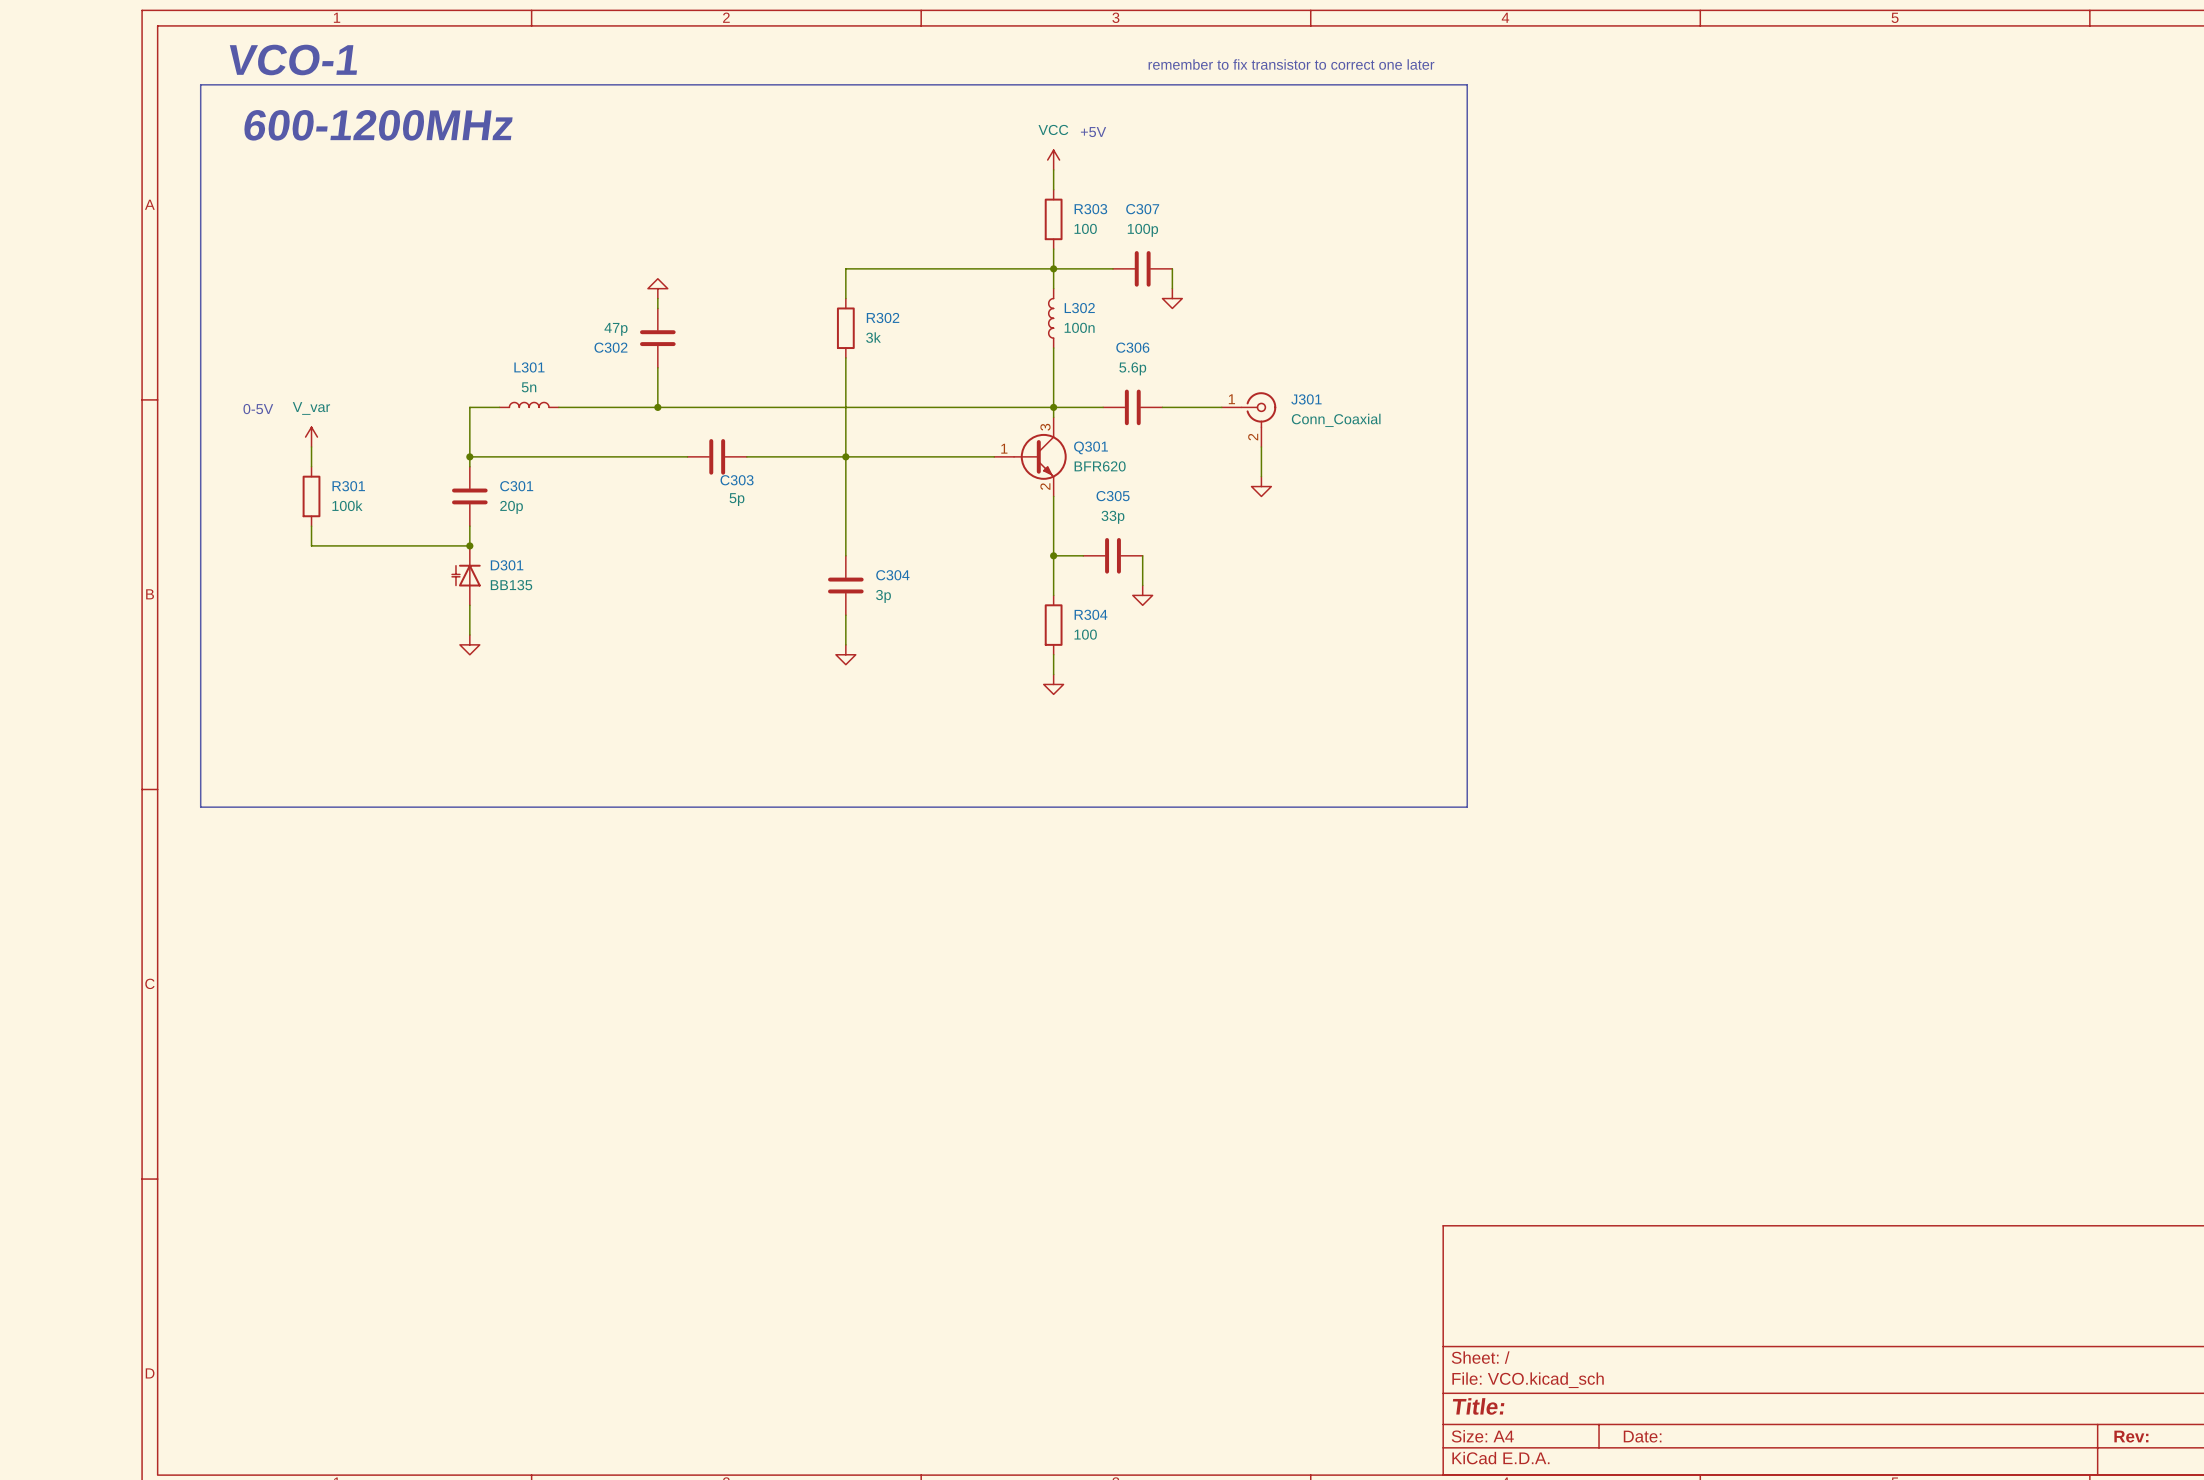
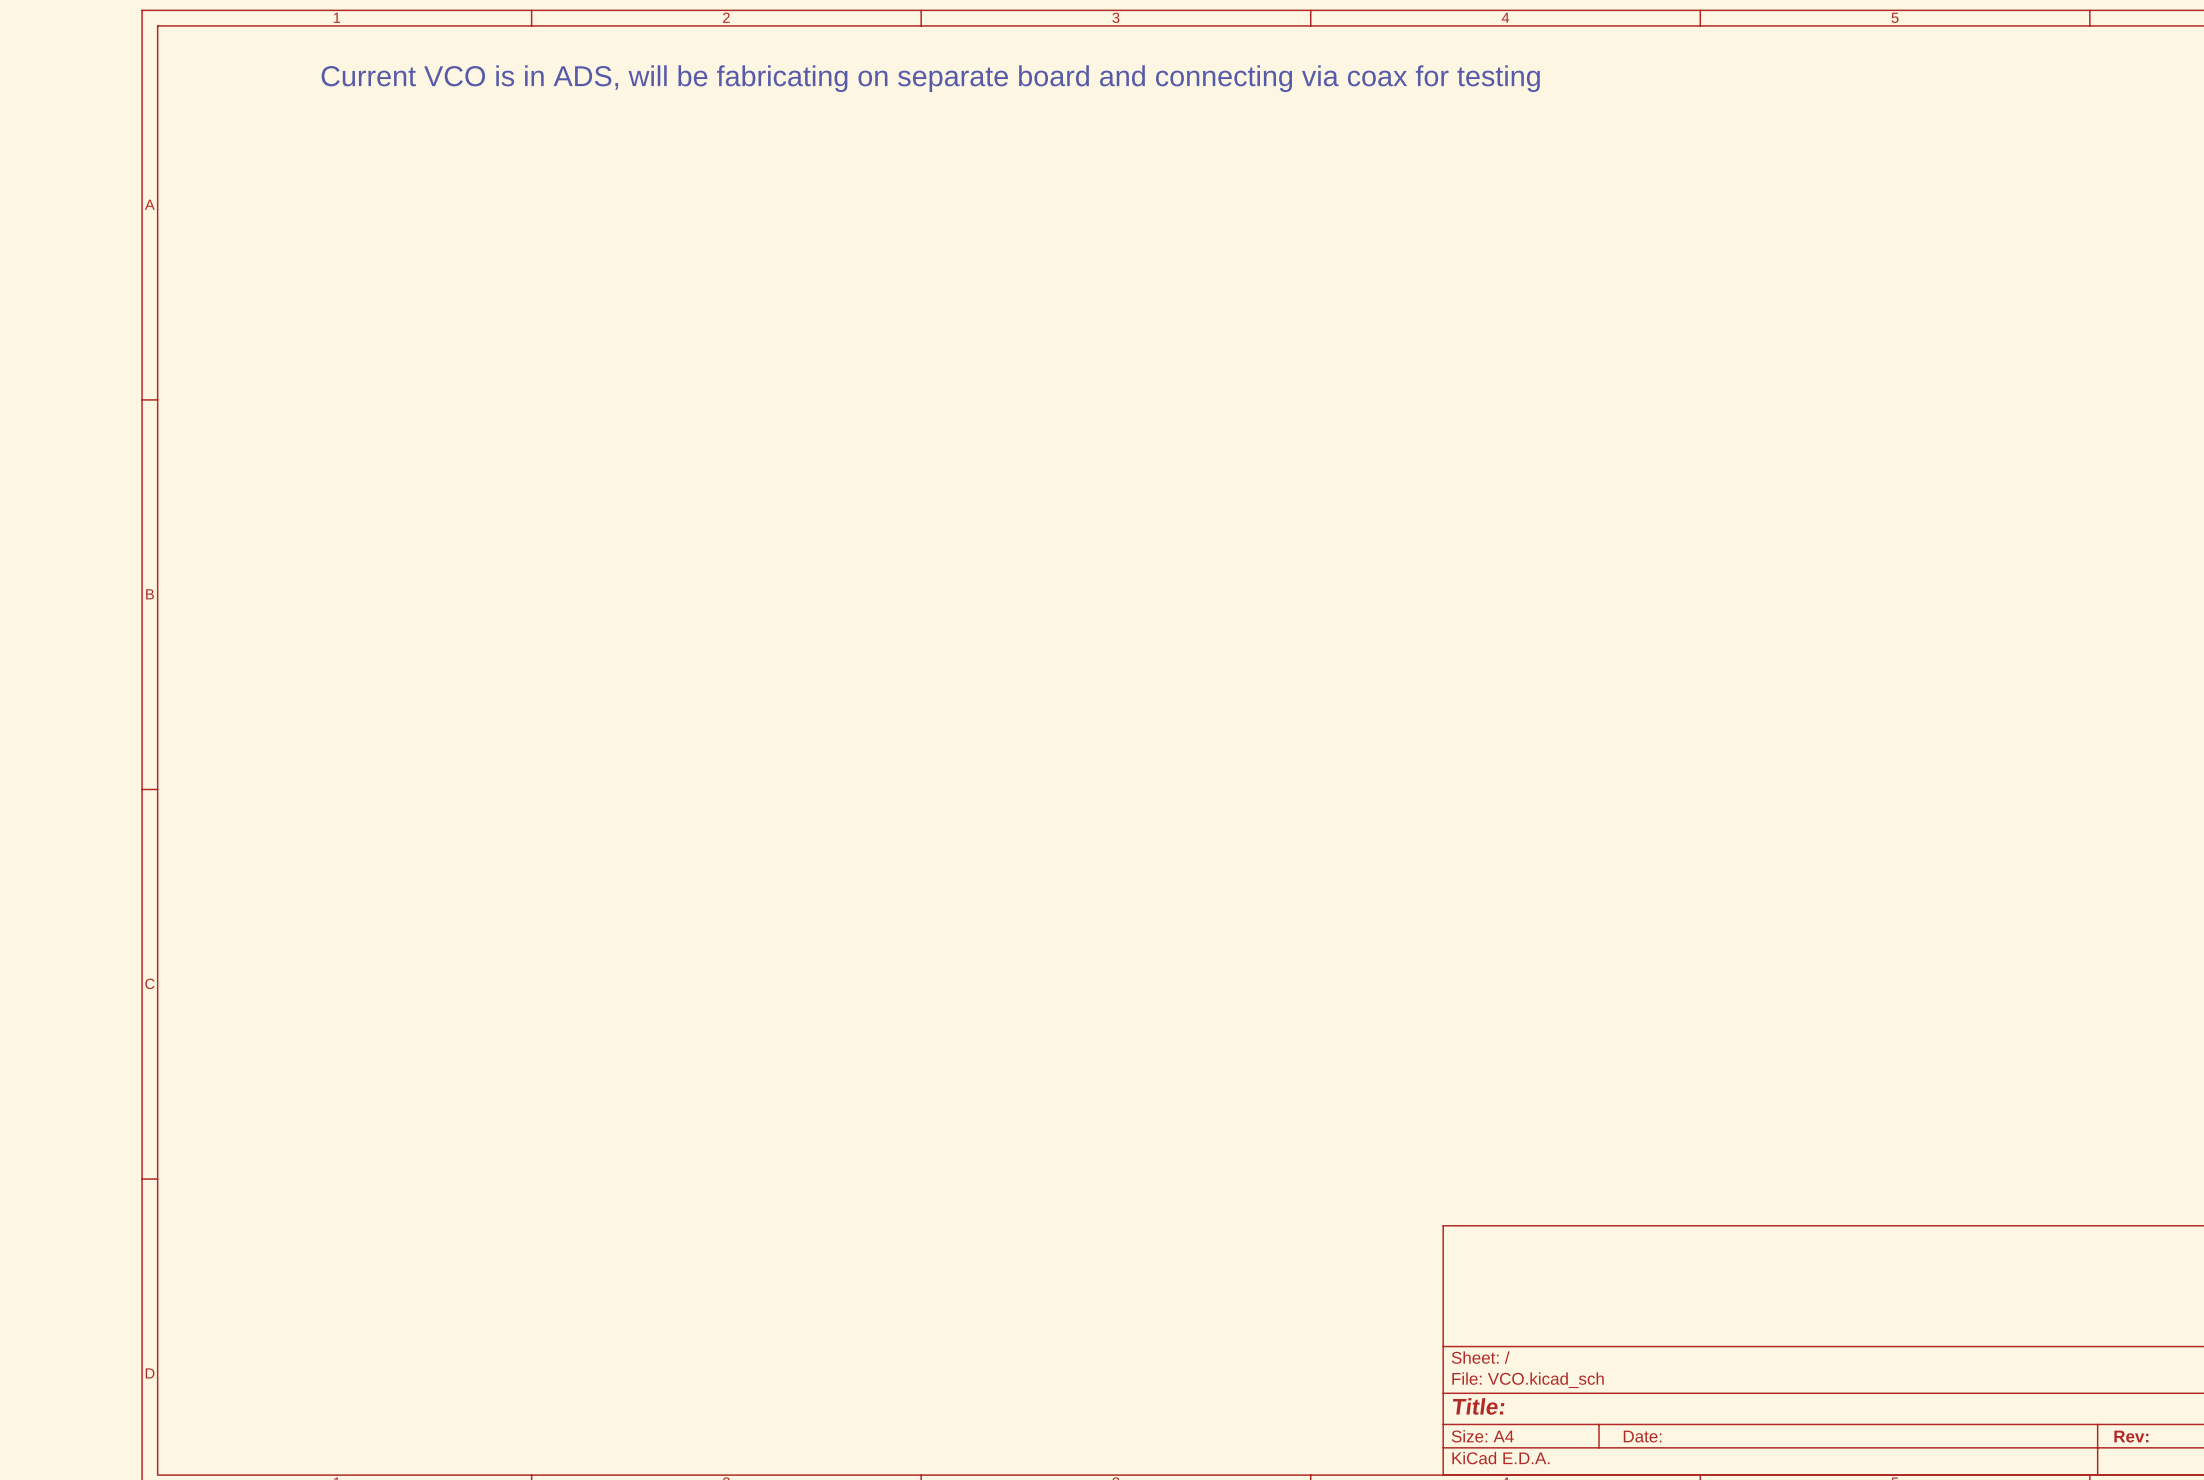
text: VCO-1 (293, 59) -> none
text: remember to fix transistor to correct one later (1291, 64) -> none
text: none -> Current VCO is in ADS, will be fabricating on separate board and connecting via coax for testing (930, 78)
line: (200, 84) (1467, 84) (1467, 807) (200, 807) (200, 84) -> none
text: 600-1200MHz (378, 125) -> none
text: +5V (1093, 132) -> none
power symbol: VCC (1053, 160) -> none
wire: (1053, 169) (1053, 189) -> none
R303: 100 (1053, 219) -> none
wire: (1053, 249) (1053, 288) -> none
junction: (1053, 268) -> none
wire: (1113, 268) (845, 268) (845, 298) -> none
C307: 100p (1142, 268) -> none
wire: (1172, 268) (1172, 288) -> none
power symbol: (657, 288) -> none
wire: (657, 298) (657, 308) -> none
power symbol: (1172, 298) -> none
L302: 100n (1051, 318) -> none
R302: 3k (845, 328) -> none
C302: 47p (657, 338) -> none
wire: (1053, 348) (1053, 417) -> none
wire: (845, 357) (845, 555) -> none
wire: (657, 367) (657, 407) -> none
L301: 5n (529, 404) -> none
wire: (499, 407) (469, 407) (469, 466) -> none
wire: (558, 407) (1103, 407) -> none
junction: (657, 407) -> none
junction: (1053, 407) -> none
C306: 5.6p (1132, 407) -> none
wire: (1162, 407) (1221, 407) -> none
text: 0-5V (258, 409) -> none
J301: Conn_Coaxial (1249, 419) -> none
power symbol: V_var (311, 437) -> none
wire: (311, 446) (311, 466) -> none
wire: (1261, 446) (1261, 476) -> none
wire: (469, 456) (687, 456) -> none
junction: (469, 456) -> none
C303: 5p (717, 456) -> none
wire: (746, 456) (994, 456) -> none
junction: (845, 456) -> none
Q301: BFR620 (1030, 456) -> none
power symbol: (1261, 486) -> none
R301: 100k (311, 496) -> none
C301: 20p (469, 496) -> none
wire: (1053, 496) (1053, 595) -> none
wire: (311, 526) (311, 545) (469, 545) (469, 526) -> none
junction: (469, 545) -> none
wire: (1053, 555) (1083, 555) -> none
junction: (1053, 555) -> none
C305: 33p (1113, 555) -> none
wire: (1142, 555) (1142, 585) -> none
D301: BB135 (466, 575) -> none
C304: 3p (845, 585) -> none
power symbol: (1142, 595) -> none
wire: (469, 605) (469, 634) -> none
wire: (845, 615) (845, 644) -> none
R304: 100 (1053, 625) -> none
power symbol: (469, 644) -> none
power symbol: (845, 654) -> none
wire: (1053, 654) (1053, 674) -> none
power symbol: (1053, 684) -> none

